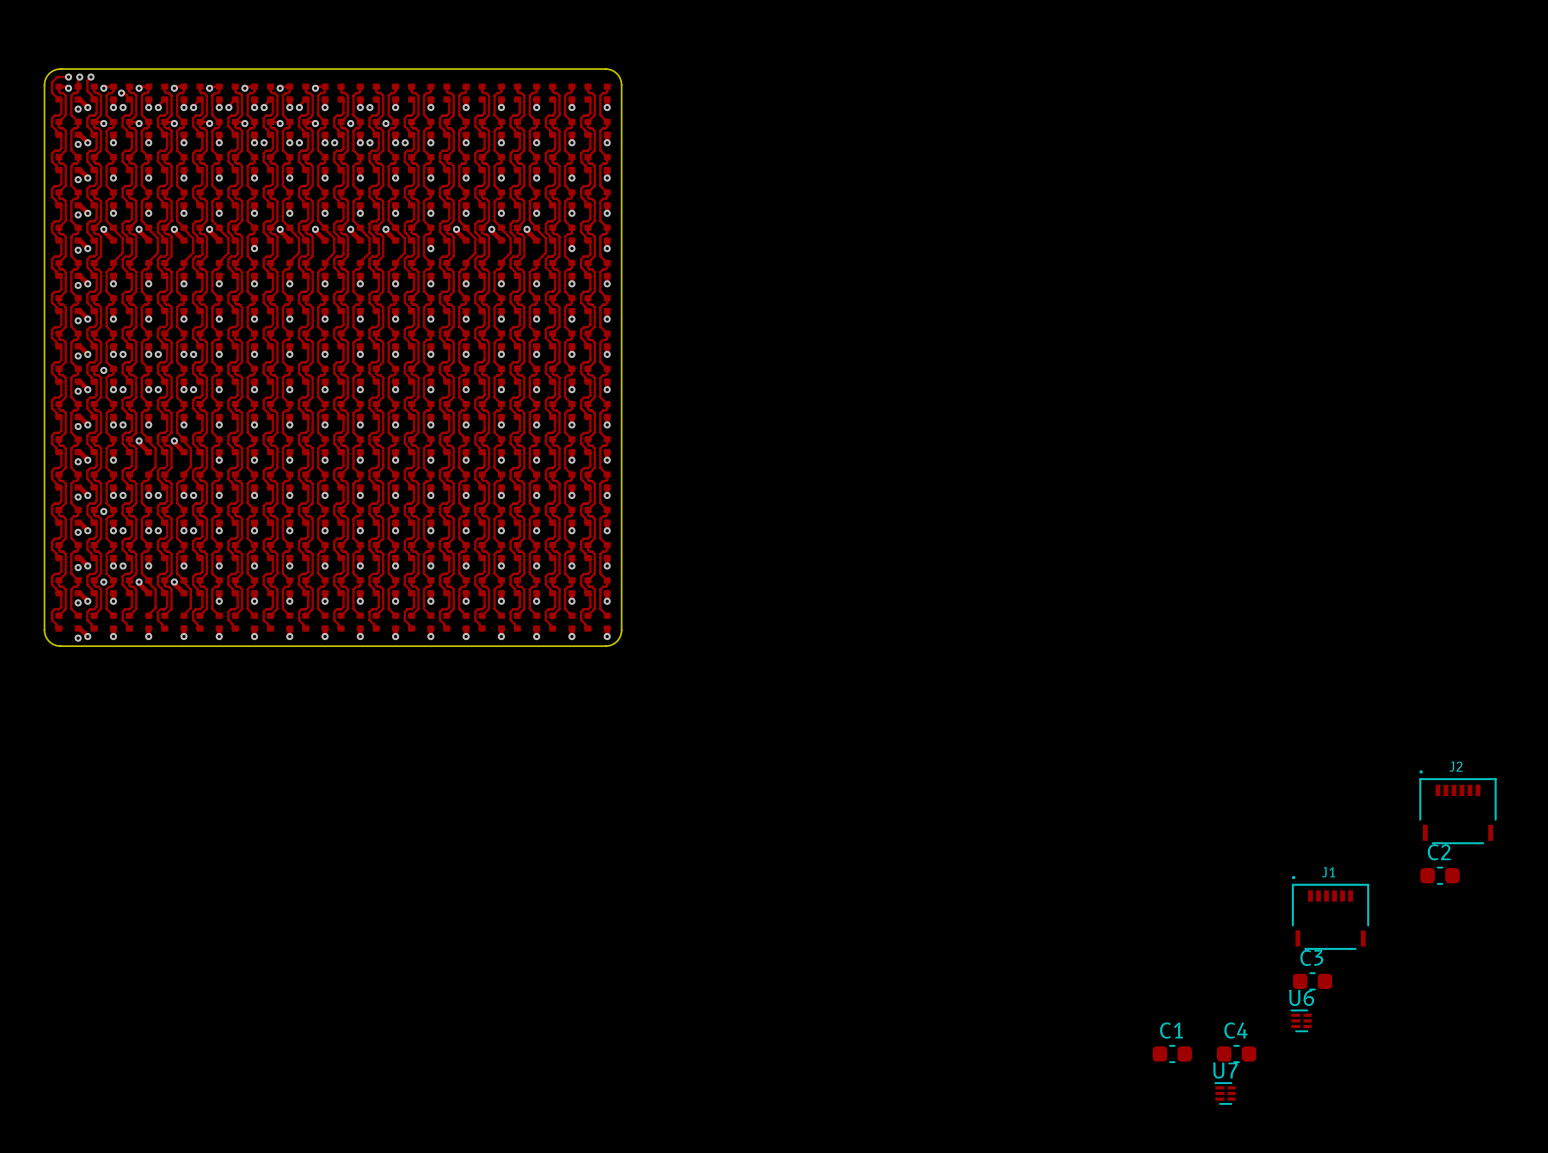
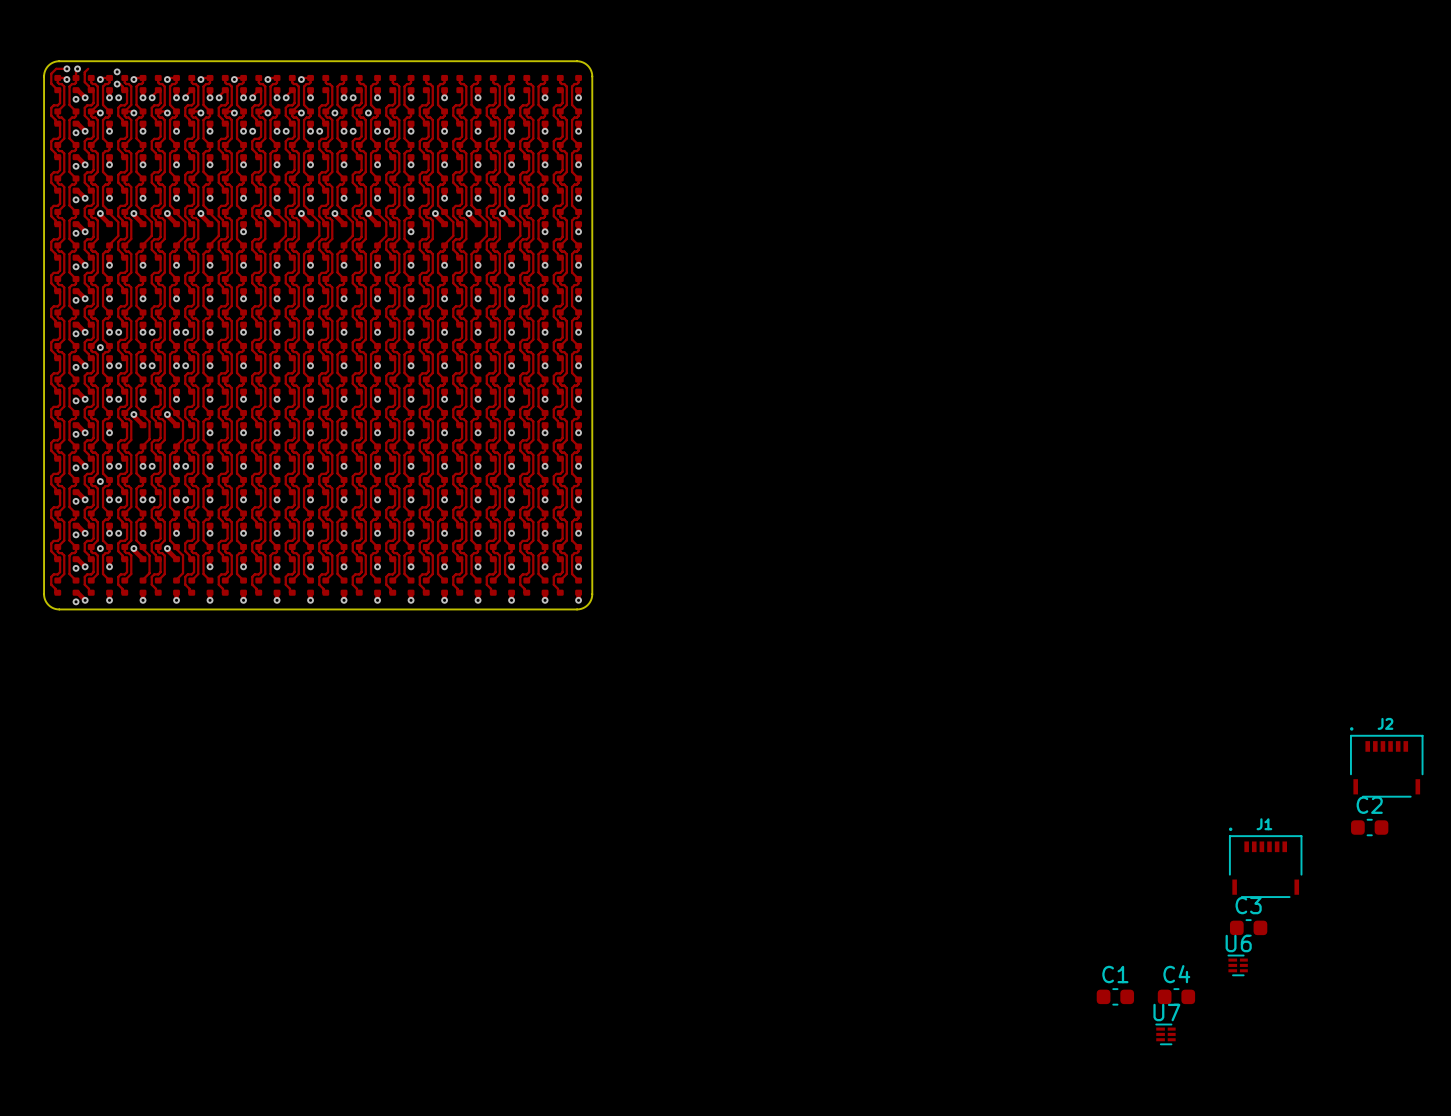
via position: (91, 77) -> (117, 71)

